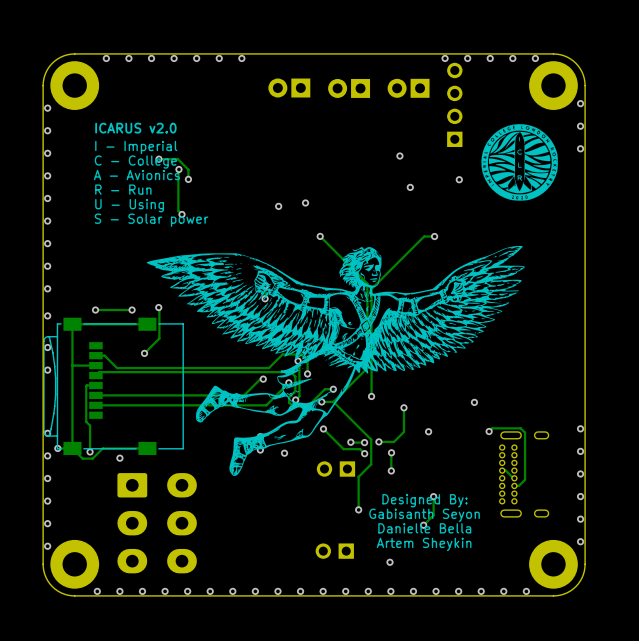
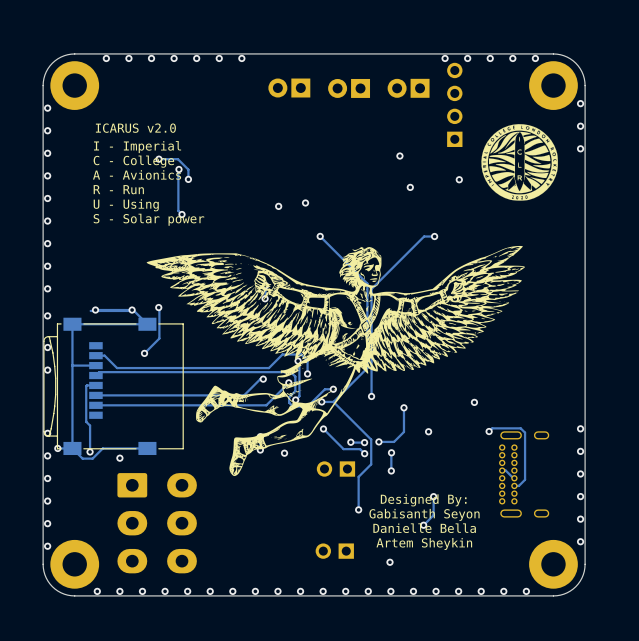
track: none -> (90, 310) (133, 310) (147, 324)

